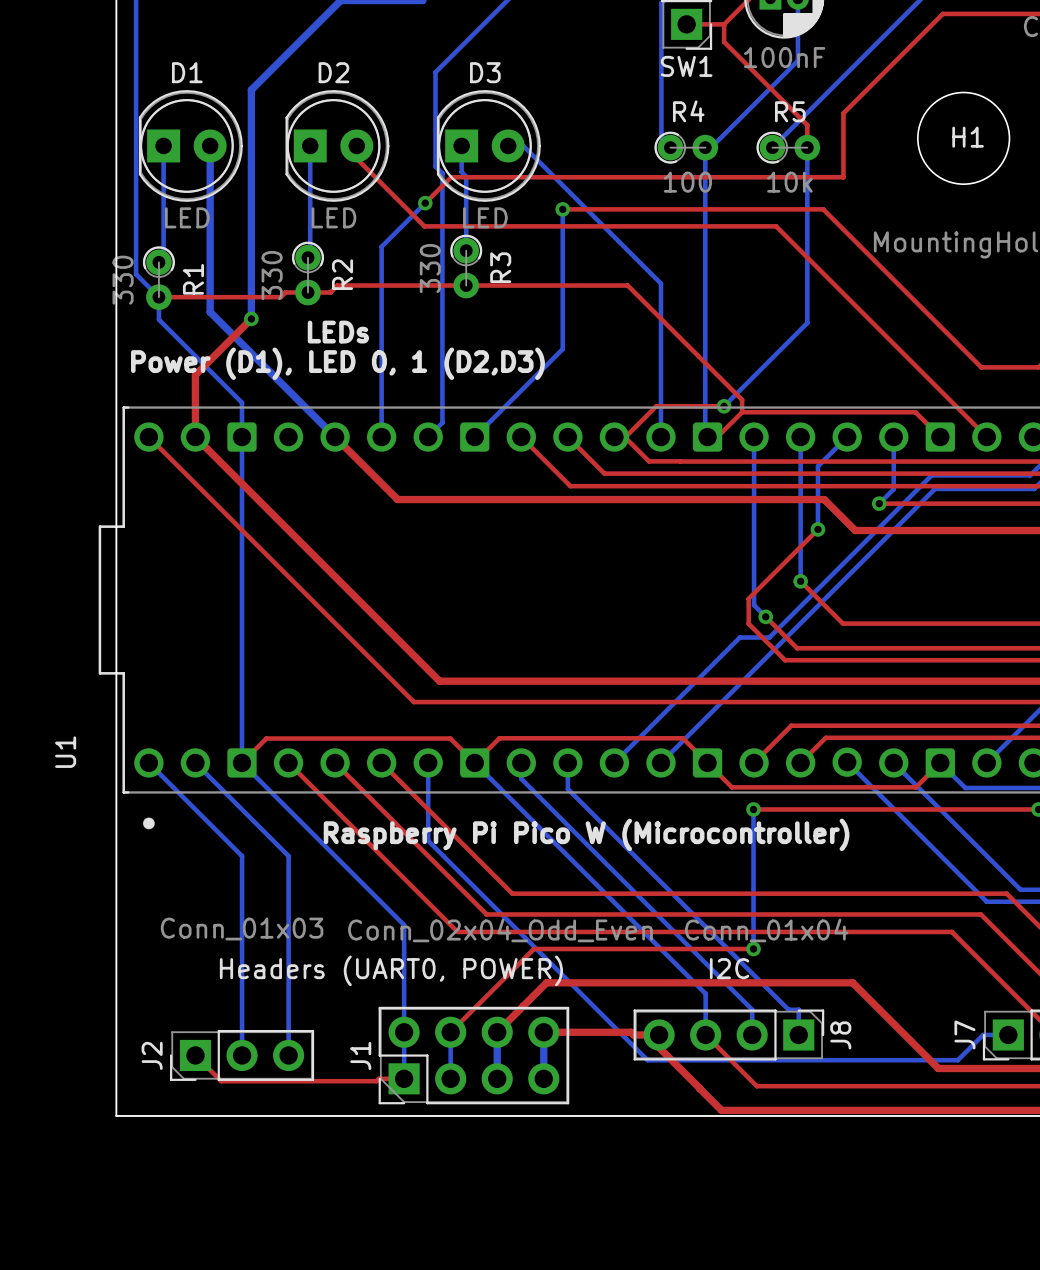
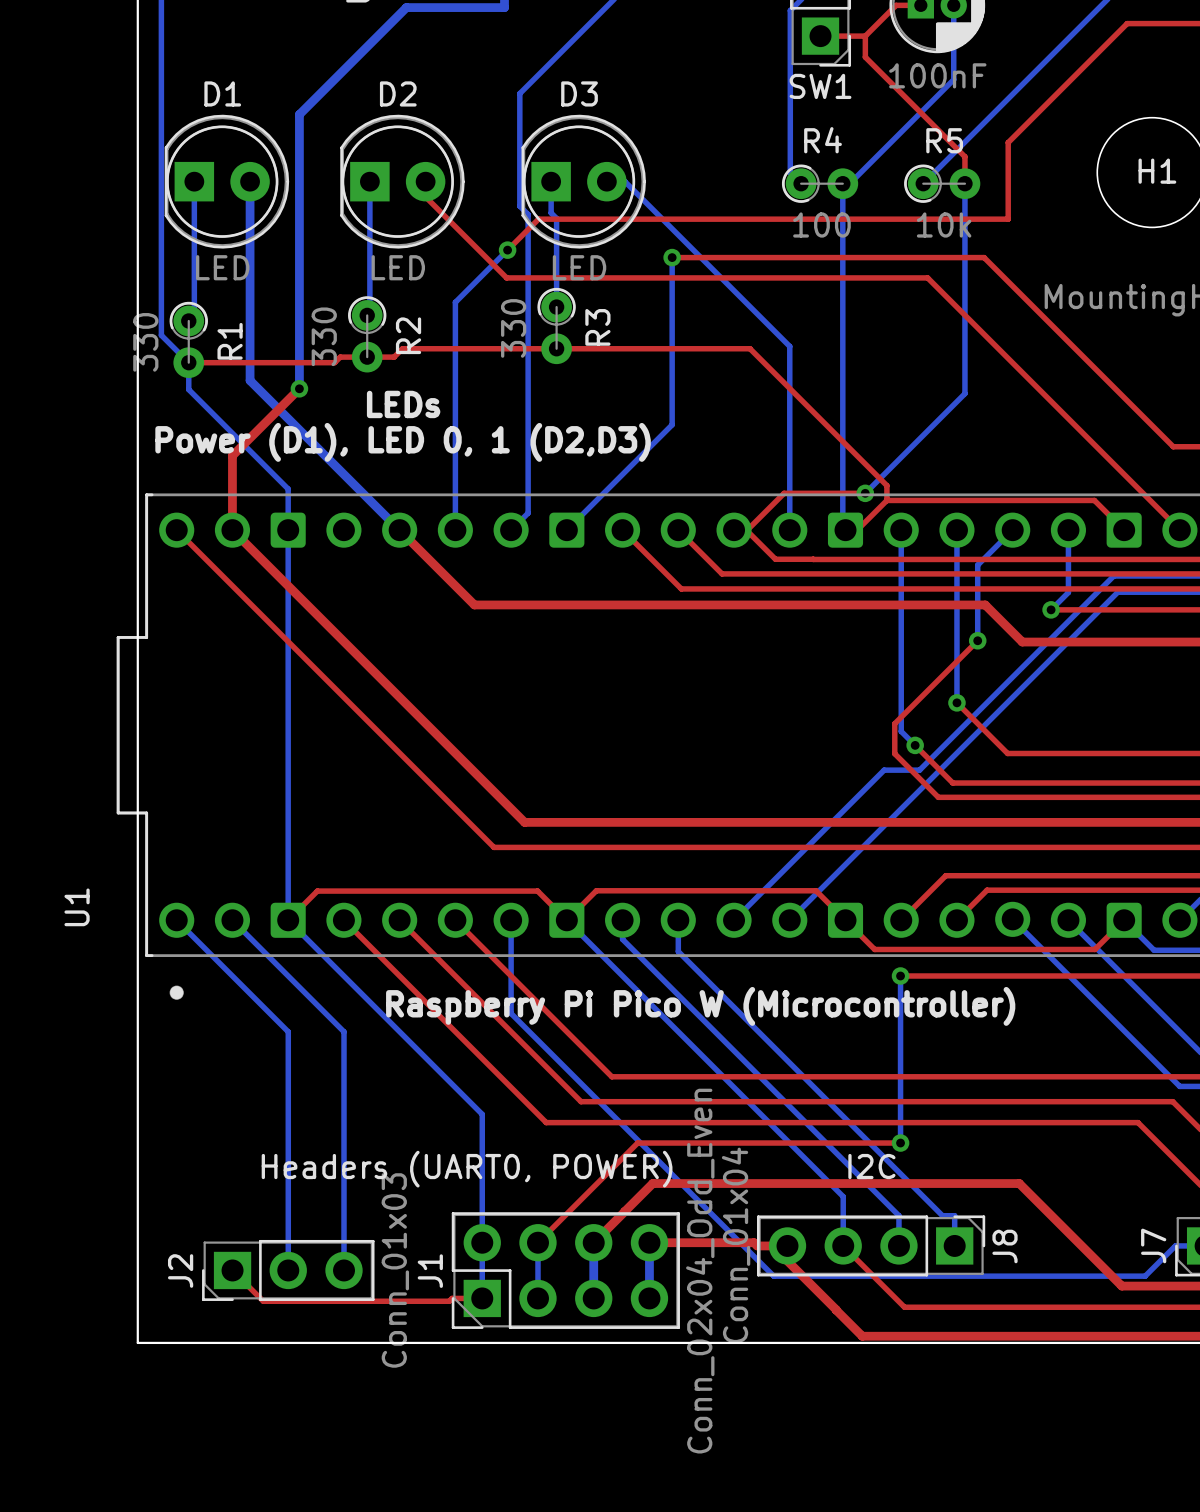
J2 value rotation: 0° (242, 929) -> 90° counterclockwise (395, 1270)
J1 value rotation: 0° (500, 930) -> 90° counterclockwise (700, 1271)
J8 value rotation: 0° (766, 930) -> 90° counterclockwise (736, 1245)

